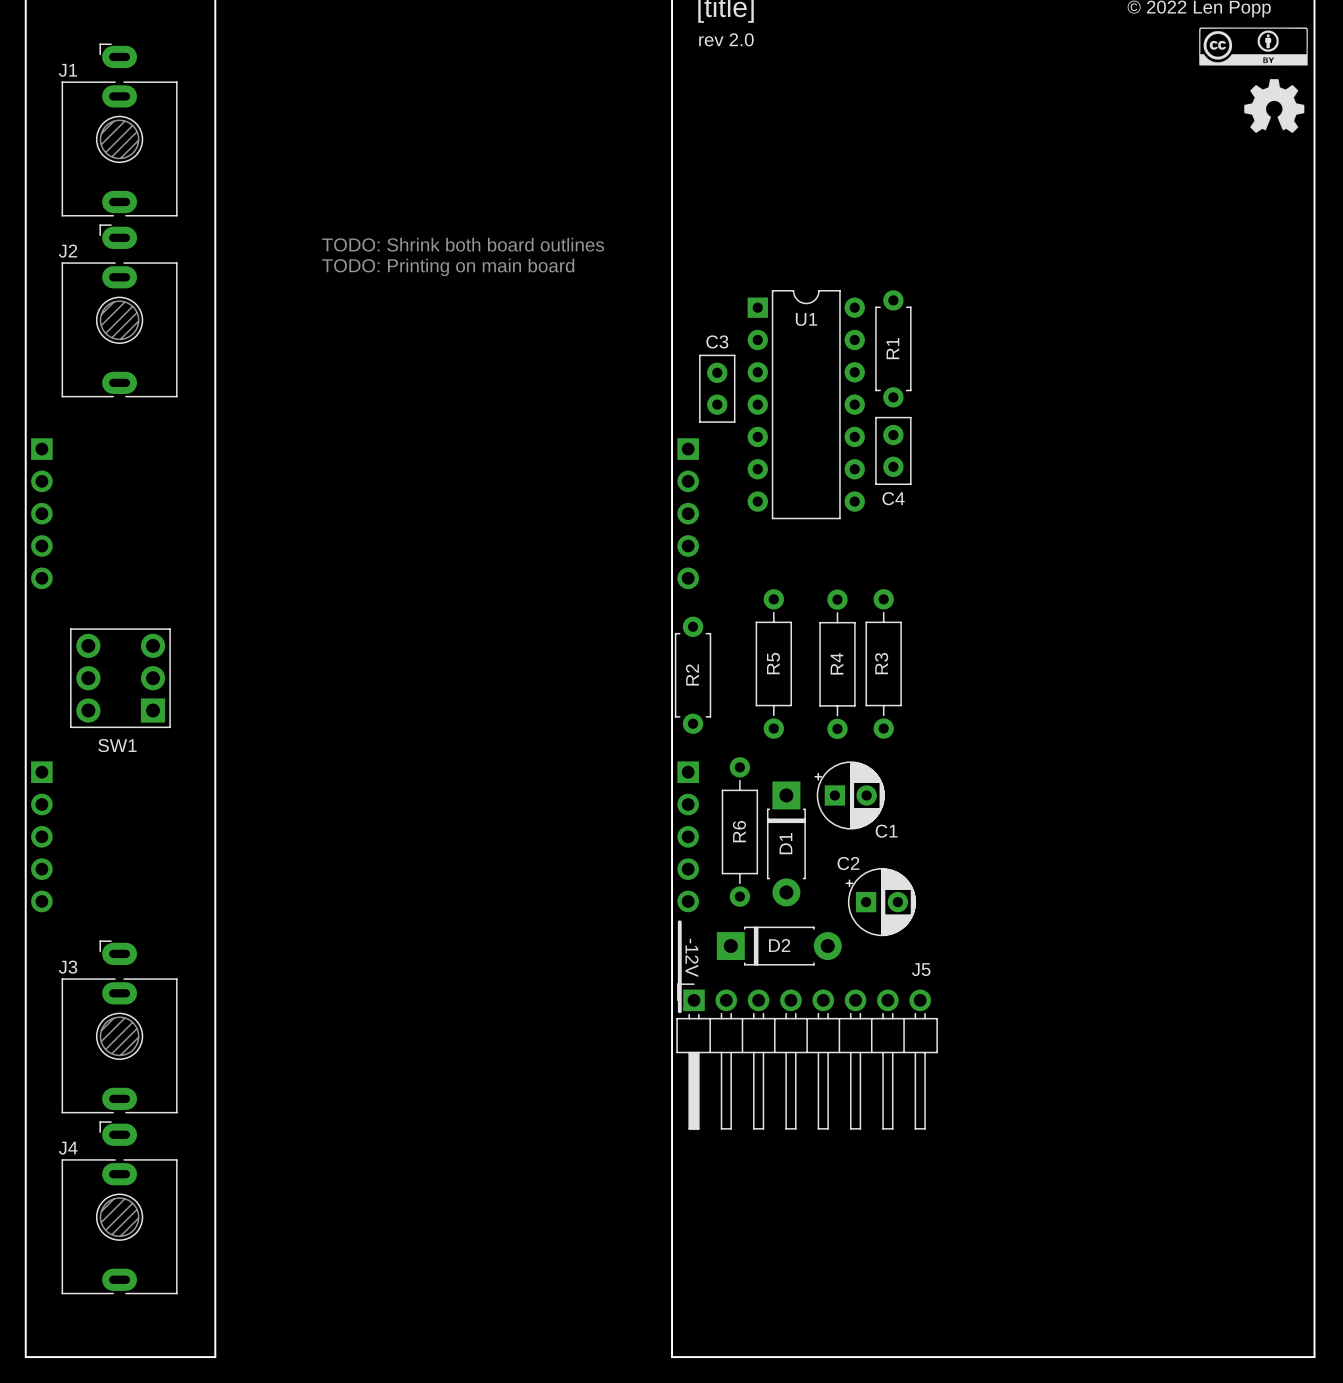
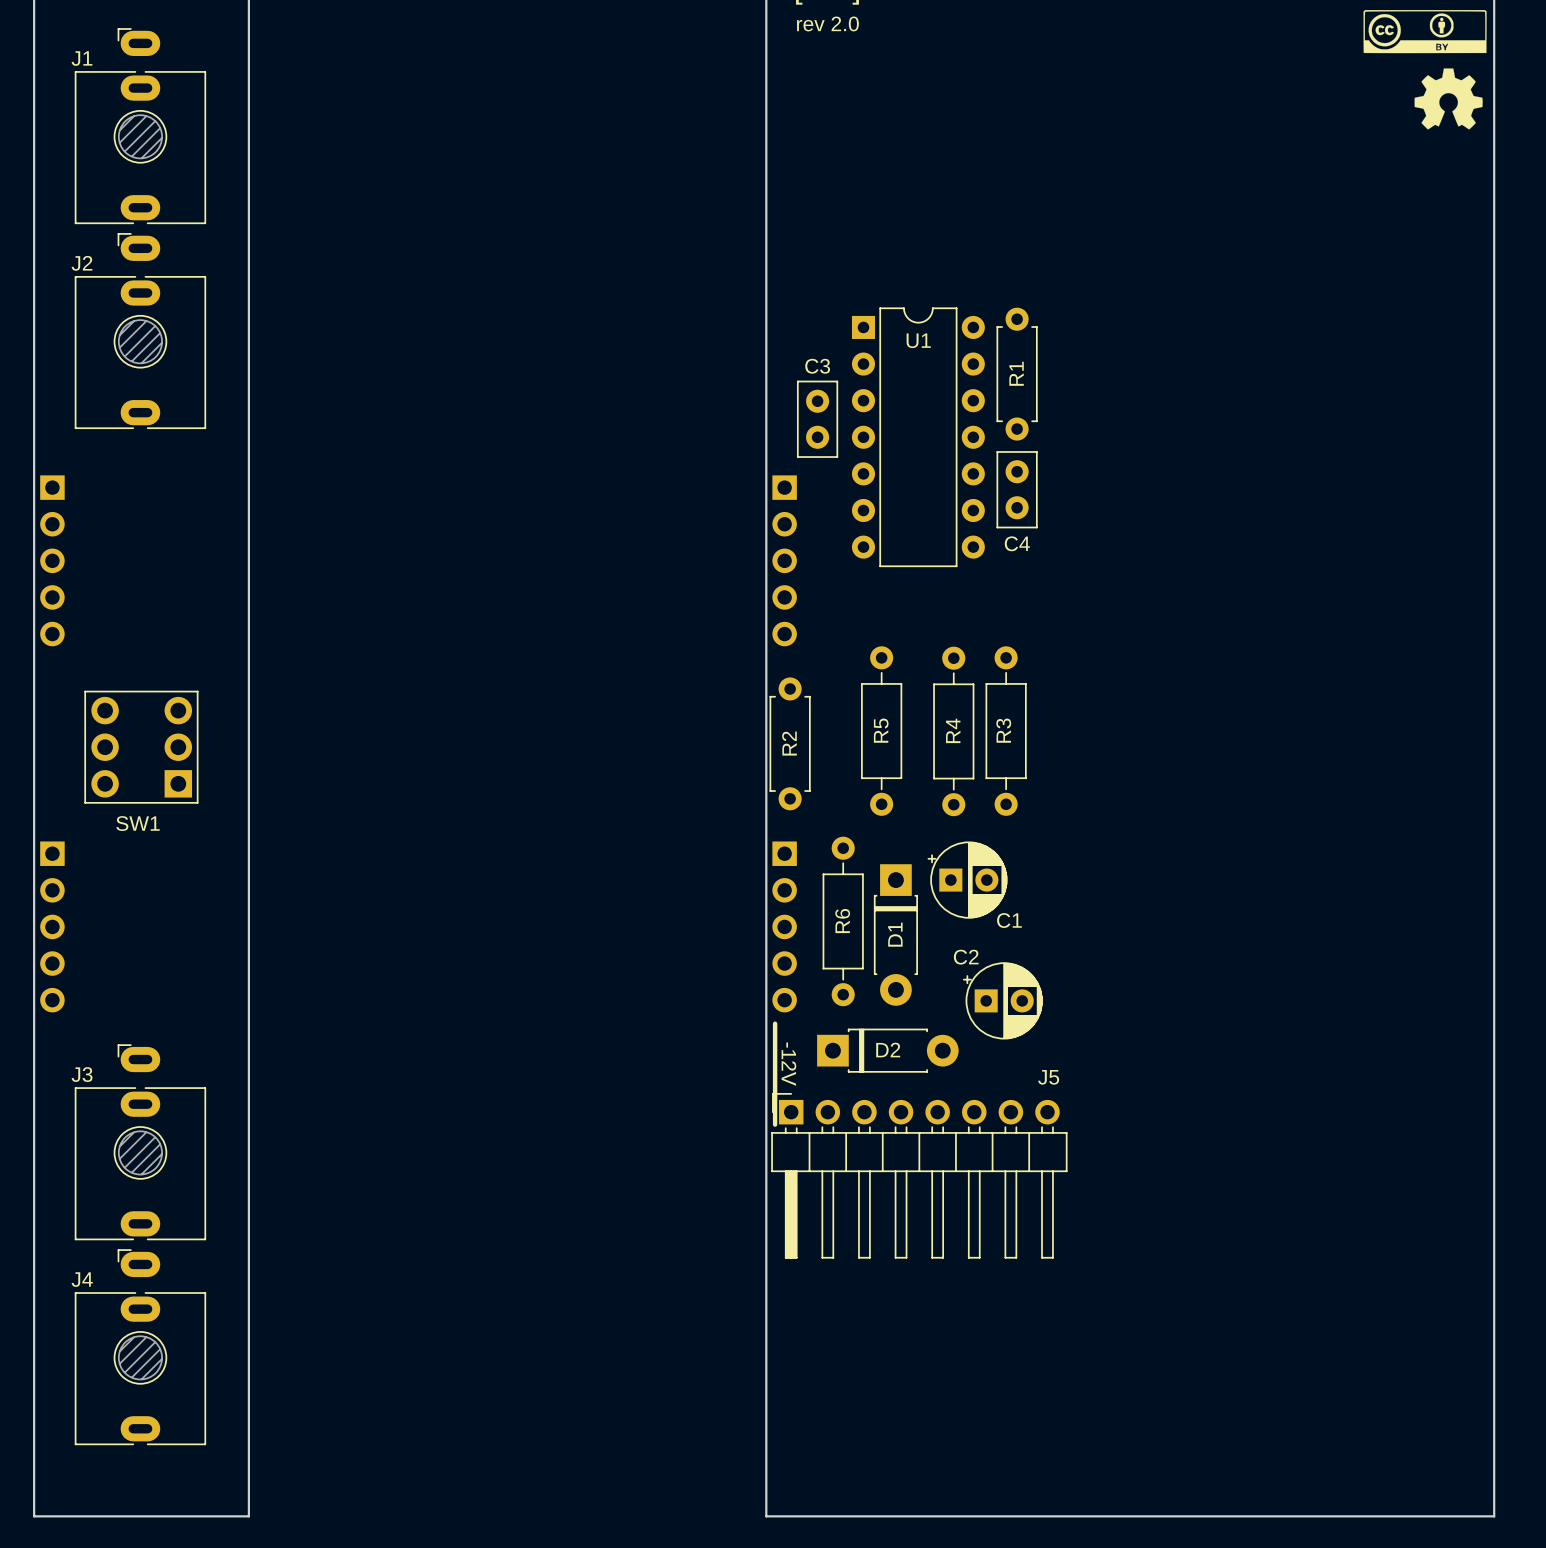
text: TODO: Shrink both board outlines (463, 244) -> none
text: TODO: Printing on main board (448, 267) -> none

